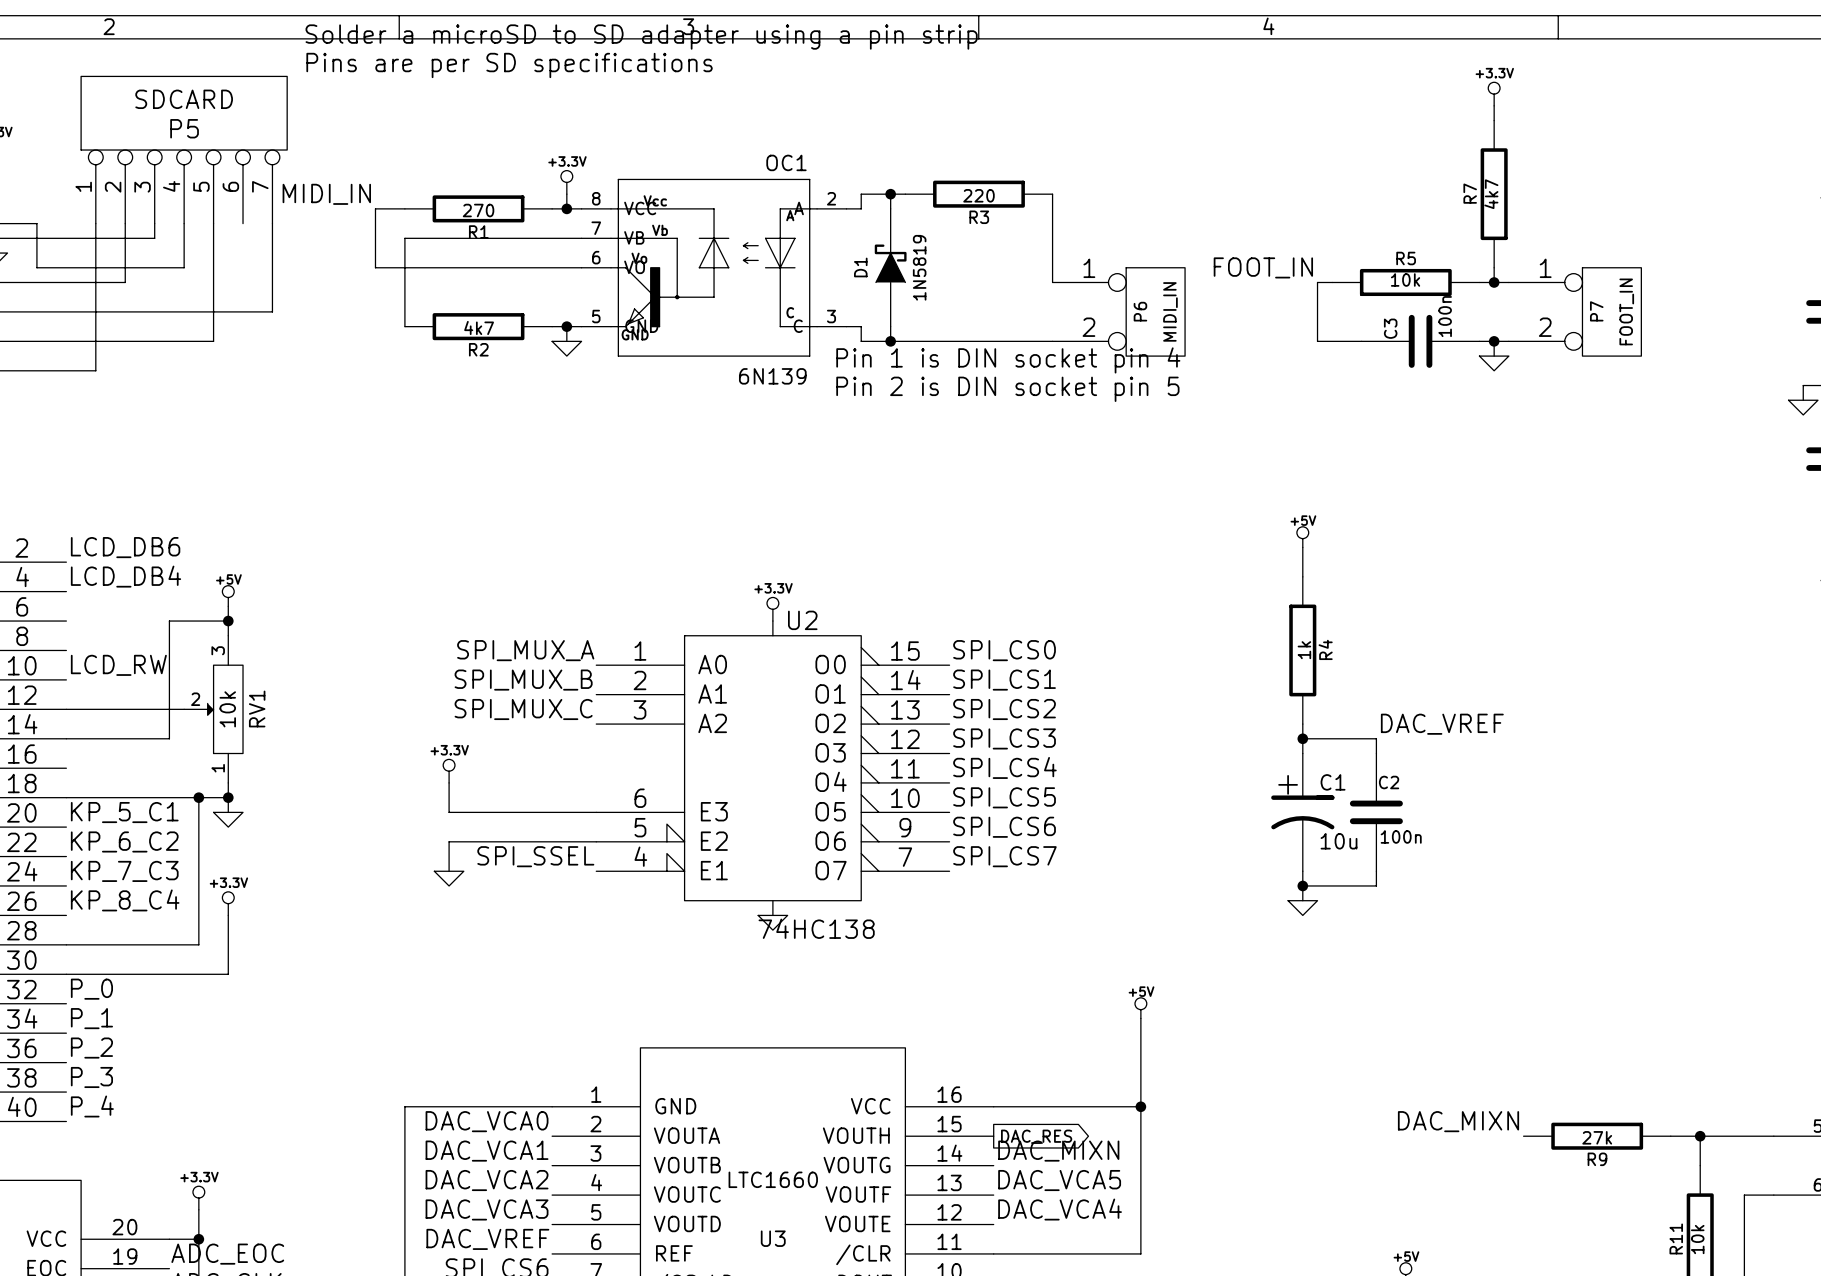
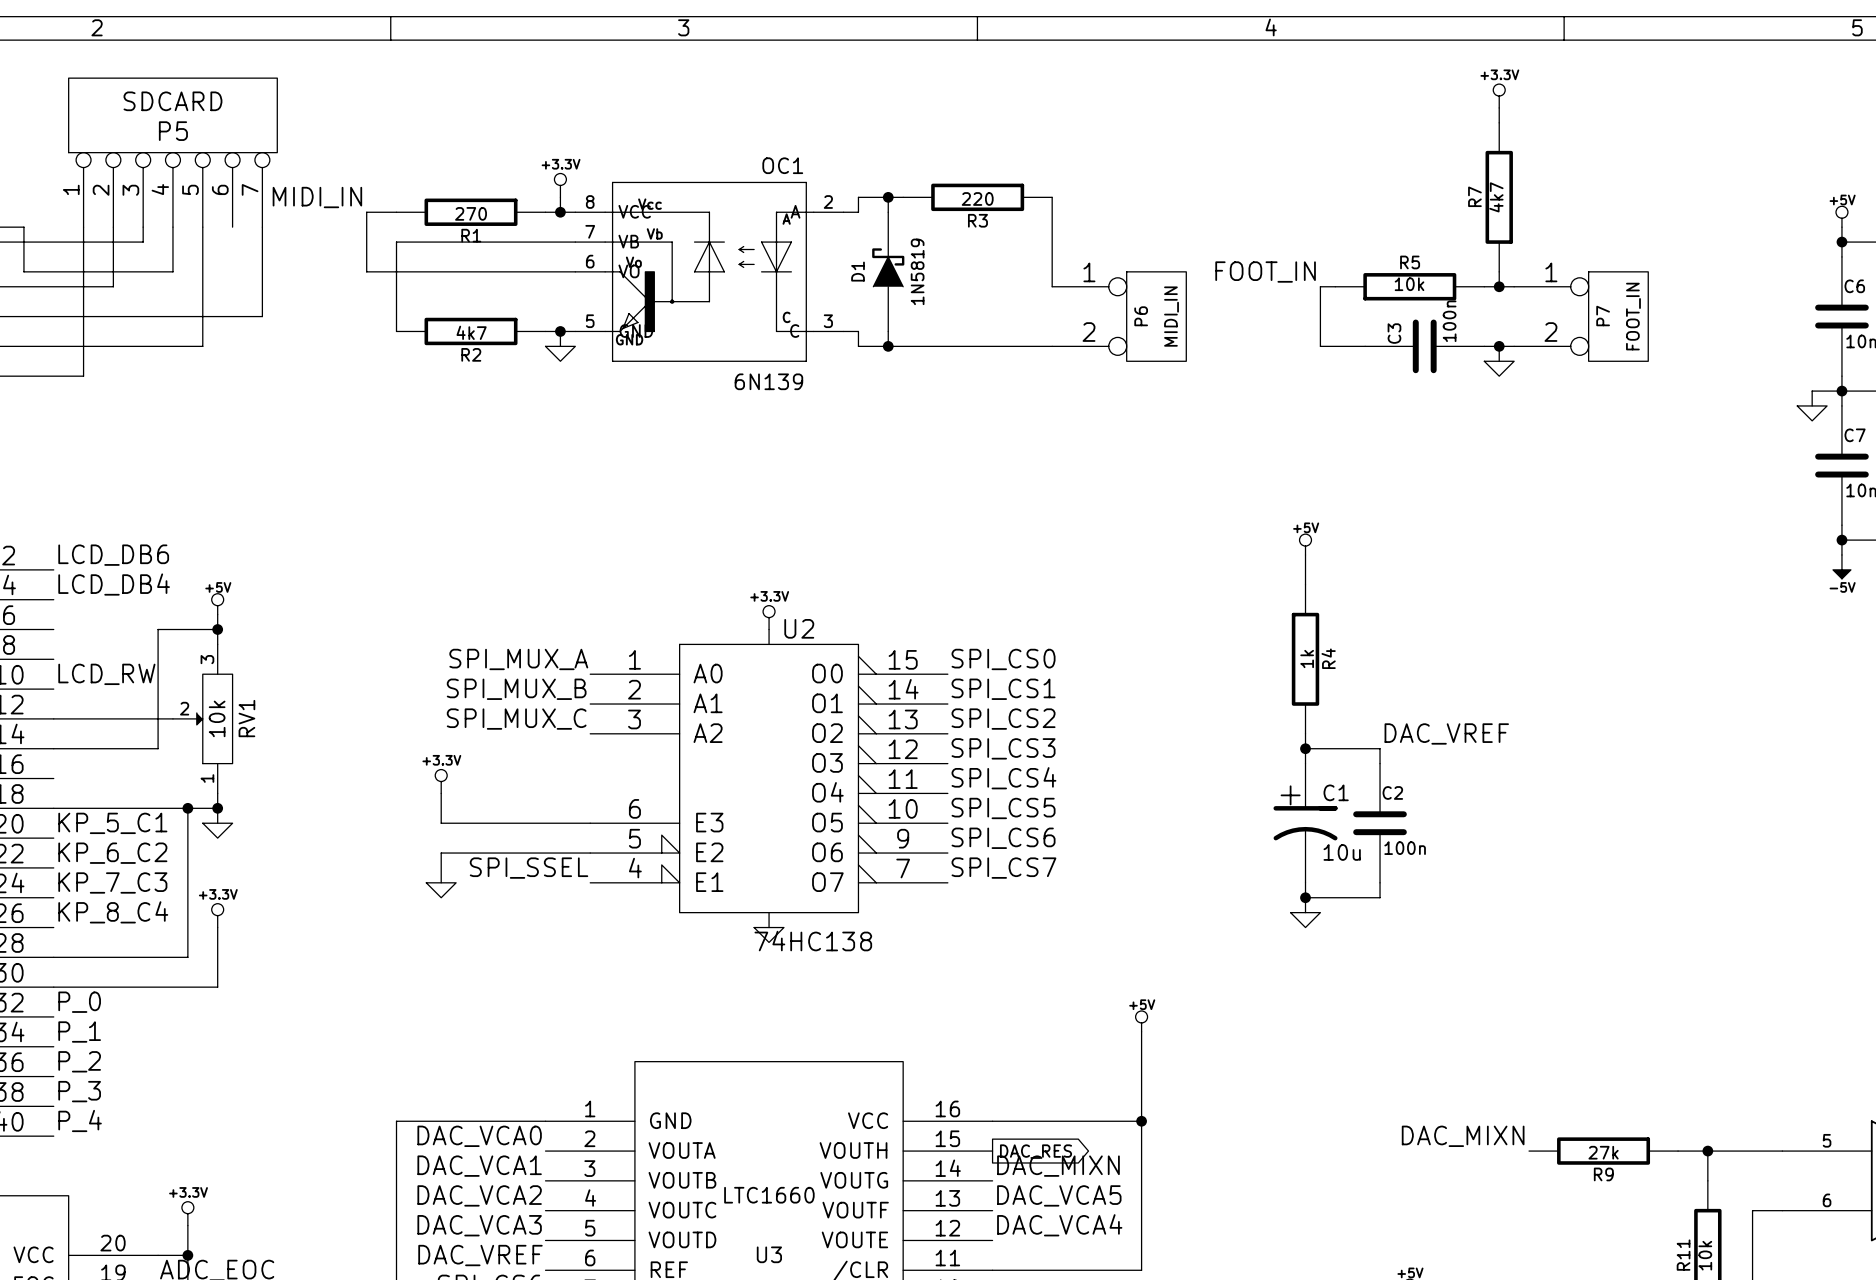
text: Solder a microSD to SD adapter using a pin strip (641, 37) -> none
text: Pins are per SD specifications (509, 65) -> none
text: Pin 1 is DIN socket pin 4 (1008, 360) -> none
text: Pin 2 is DIN socket pin 5 (1007, 389) -> none

